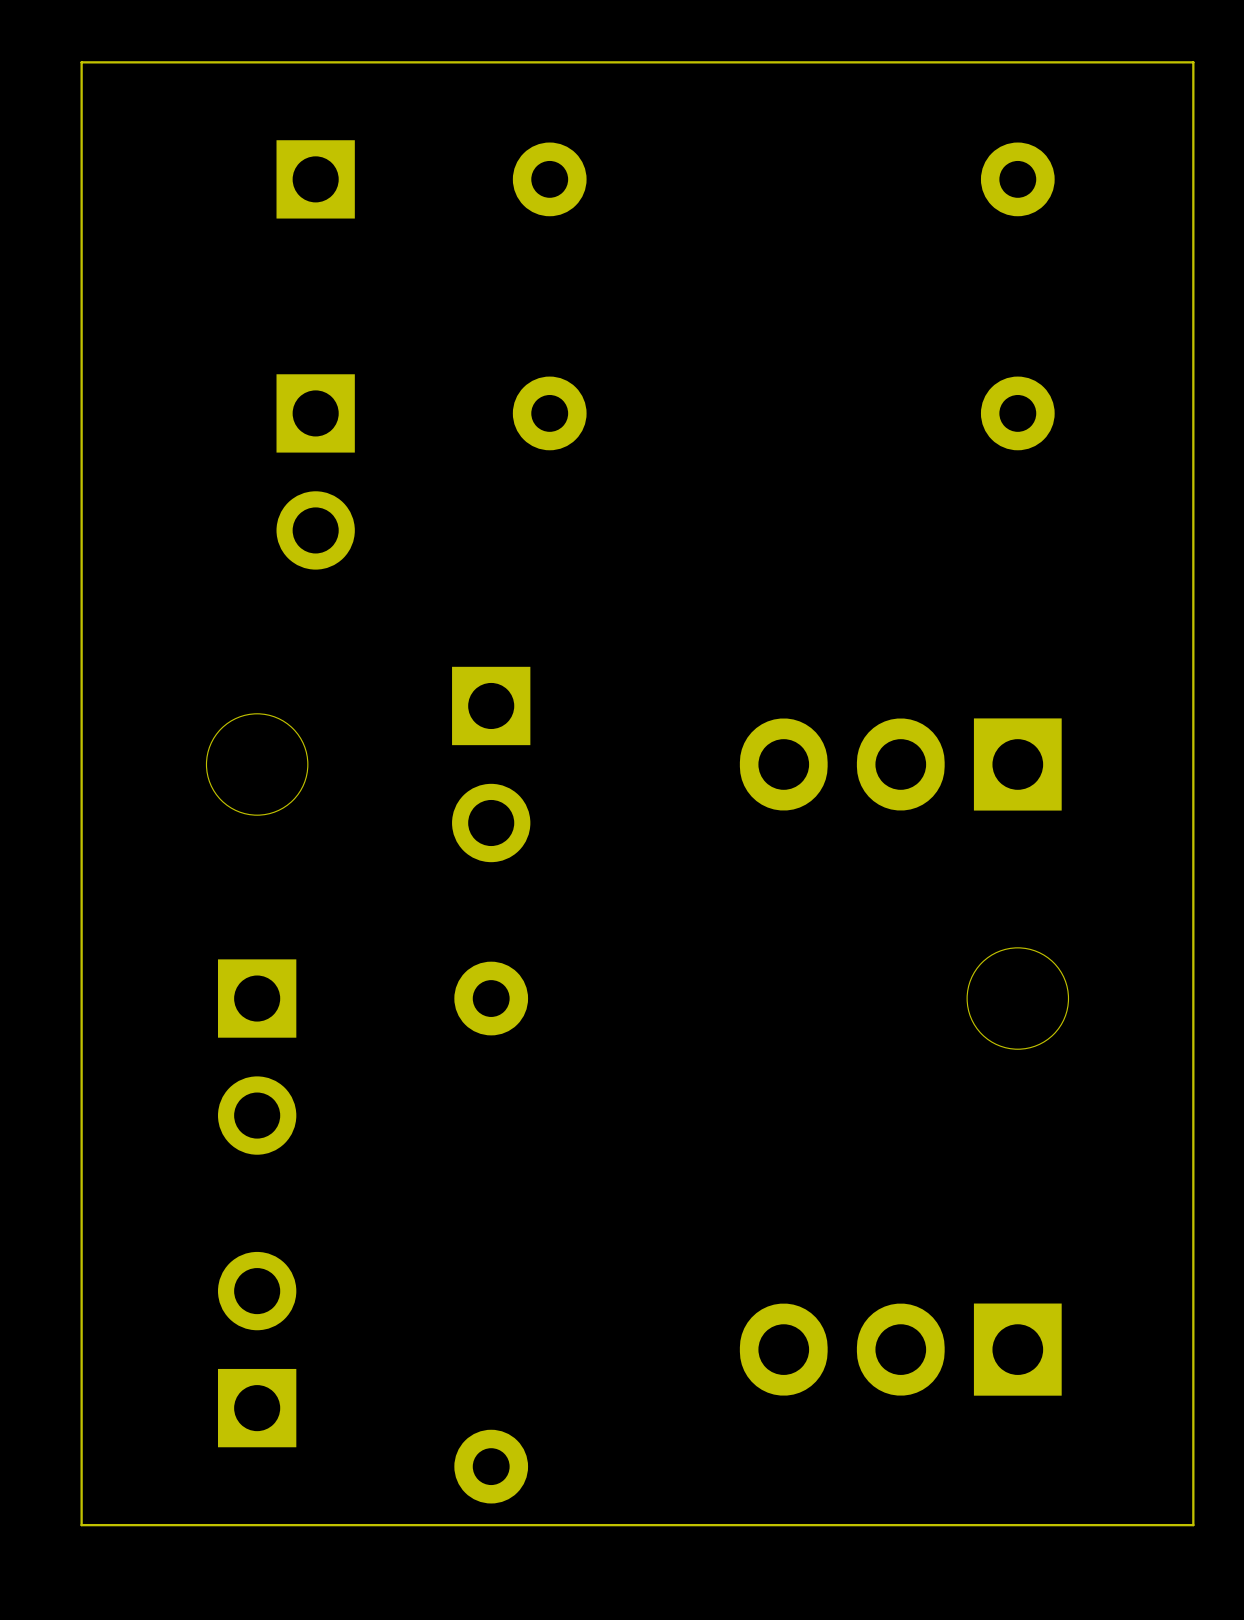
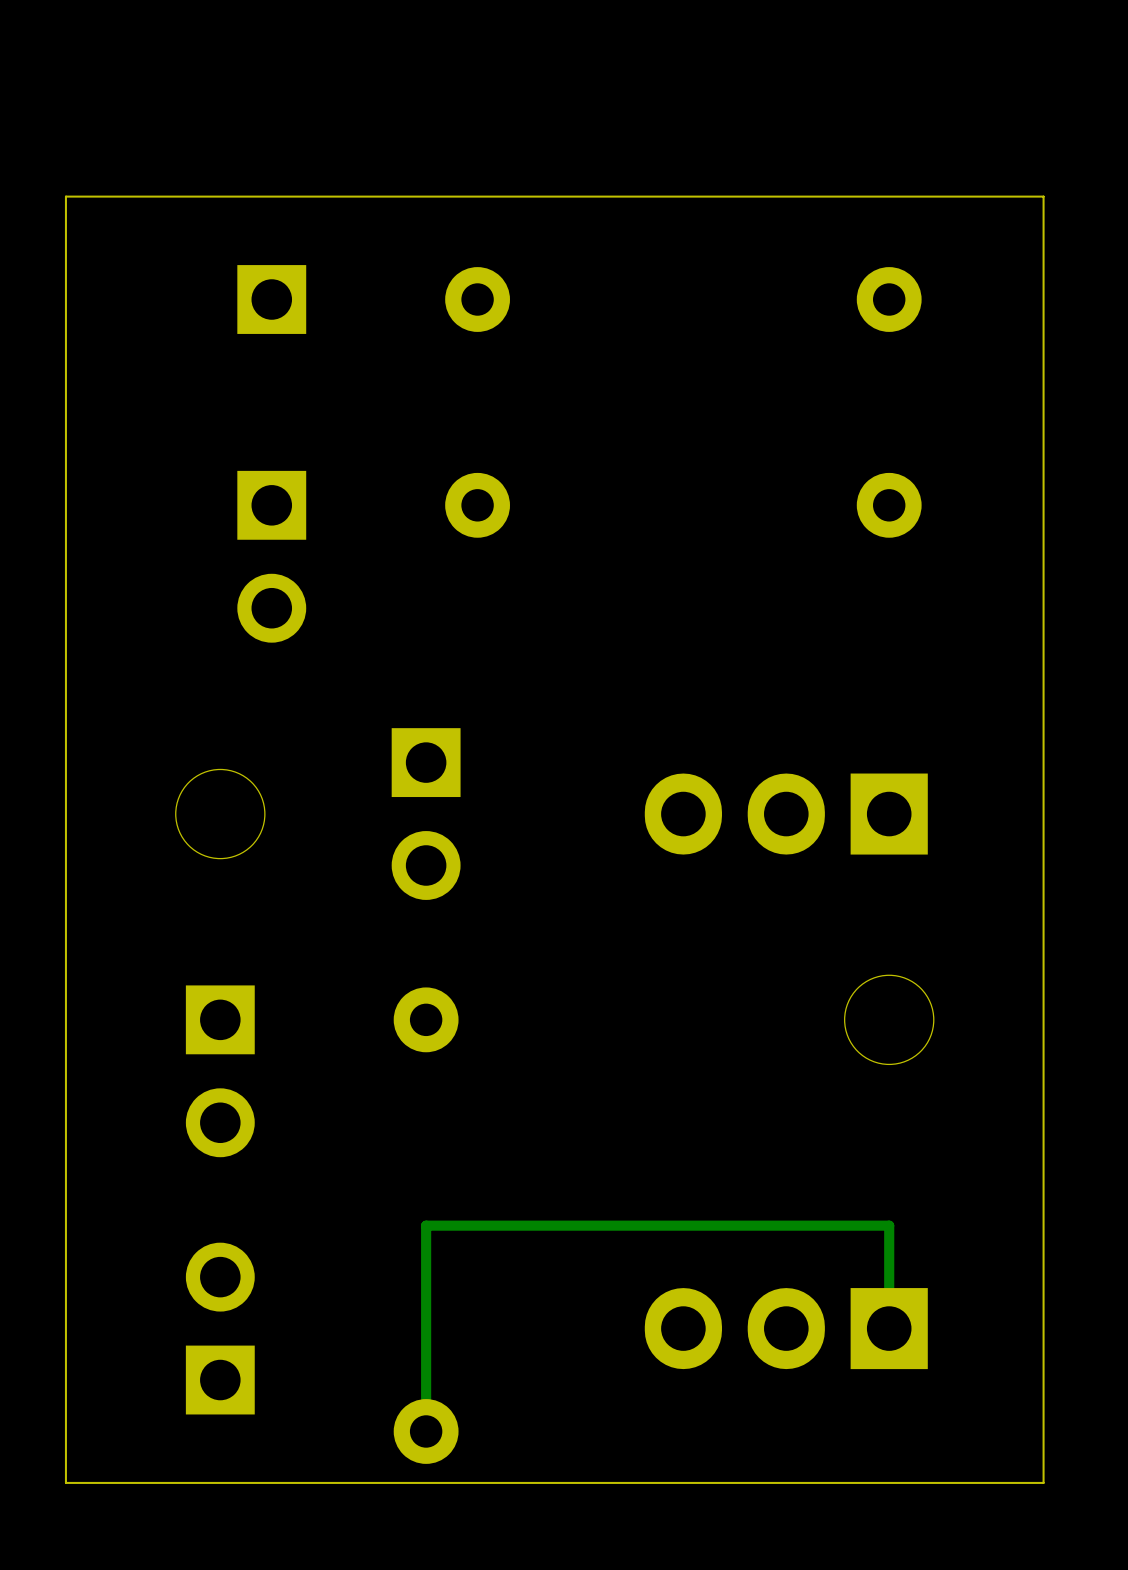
track: none -> (889, 1328) (889, 1225) (426, 1225) (426, 1431)

